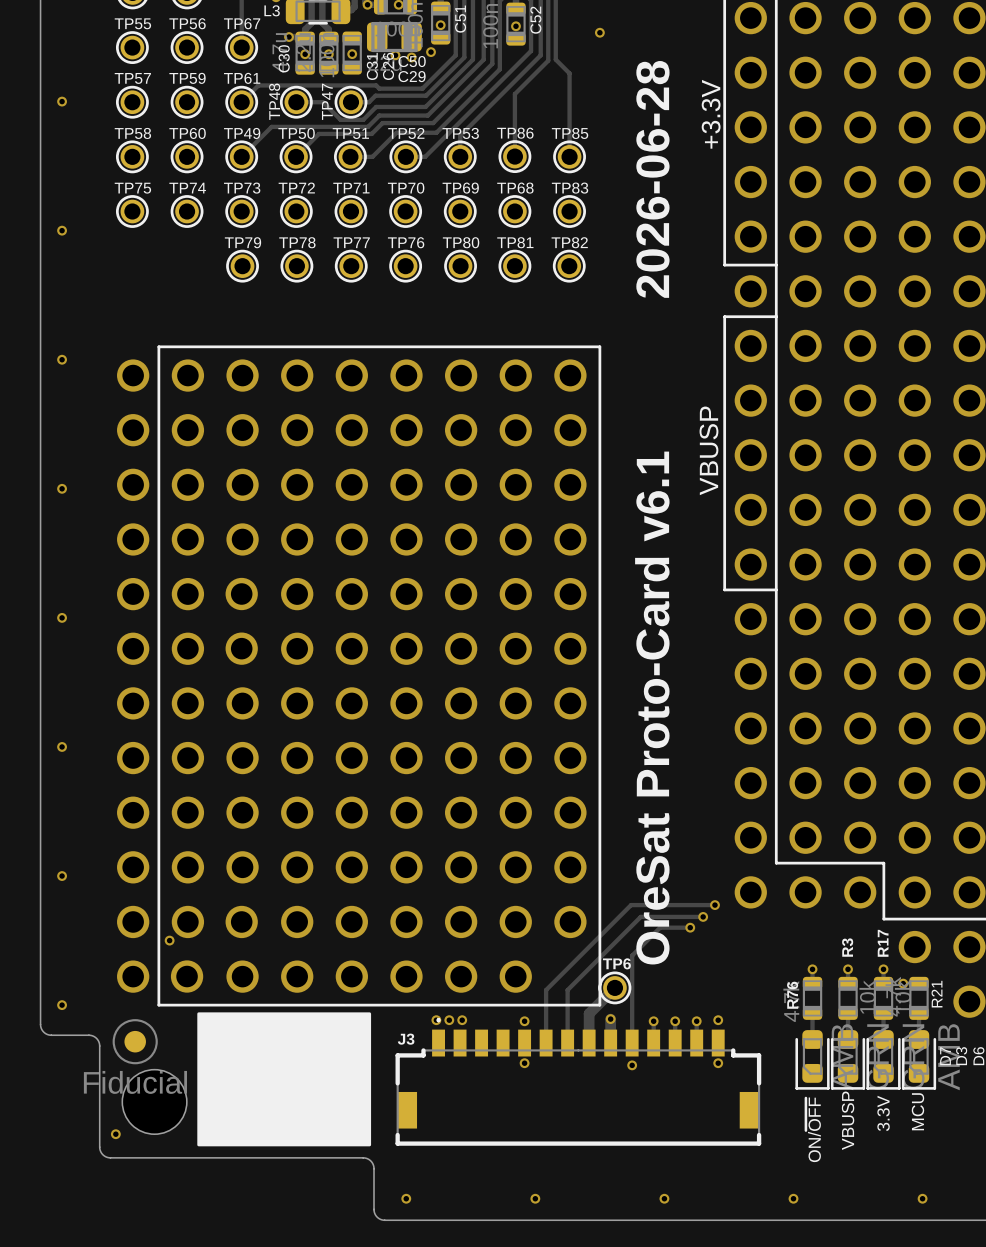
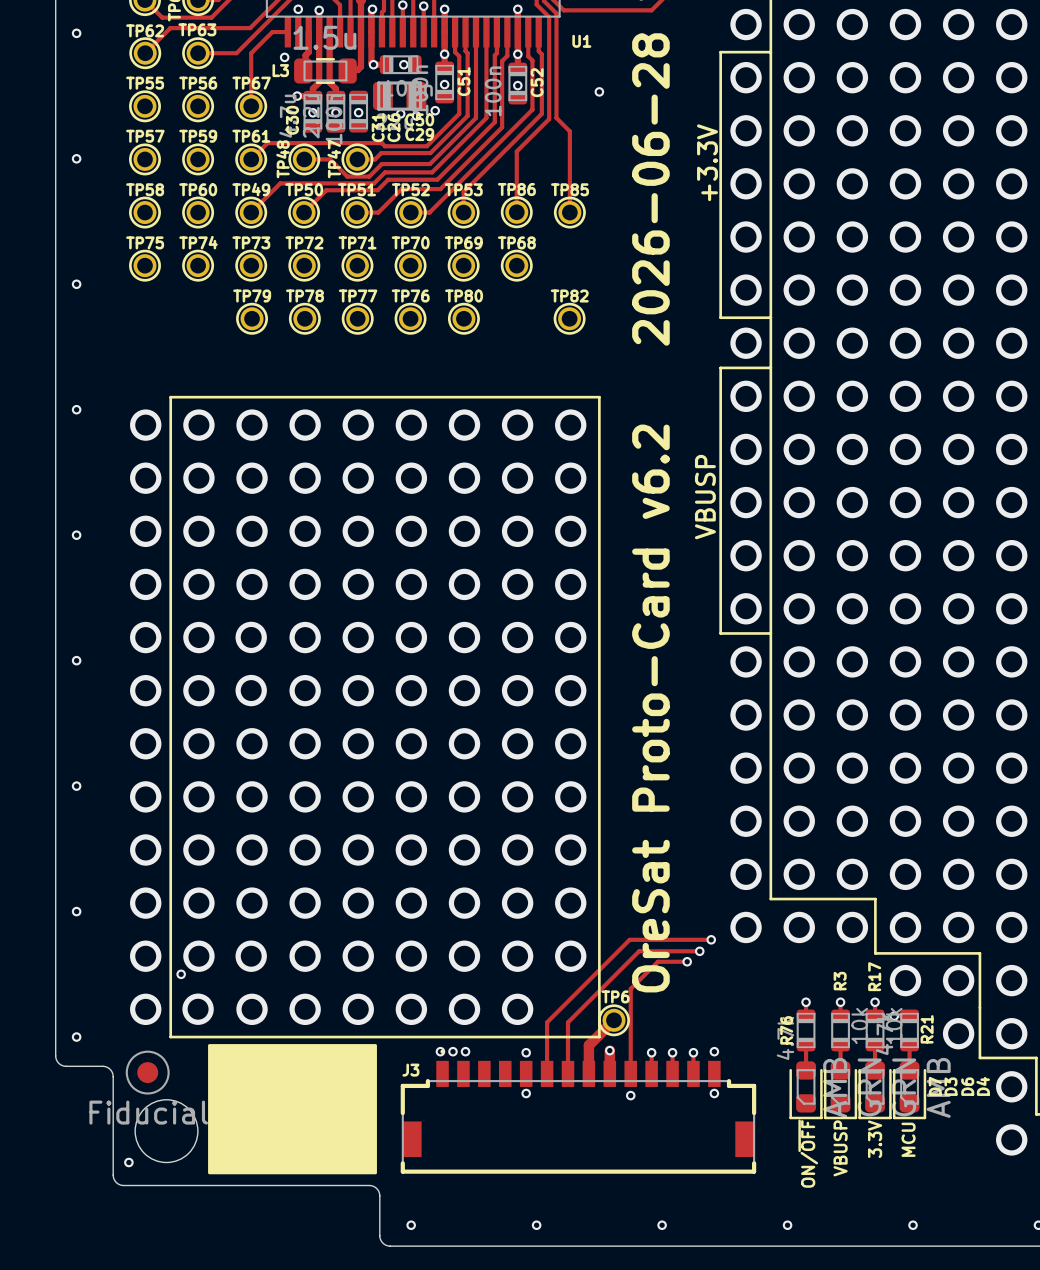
TP83: (569, 211) -> none
TP81: (514, 266) -> none
text: OreSat Proto-Card v6.1 (652, 708) -> OreSat Proto-Card v6.2 (650, 708)

